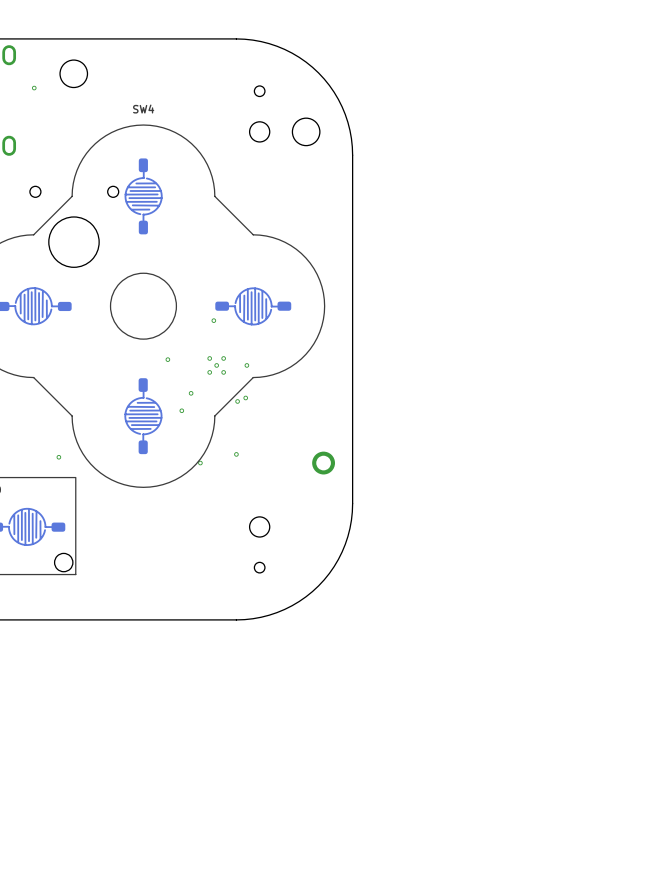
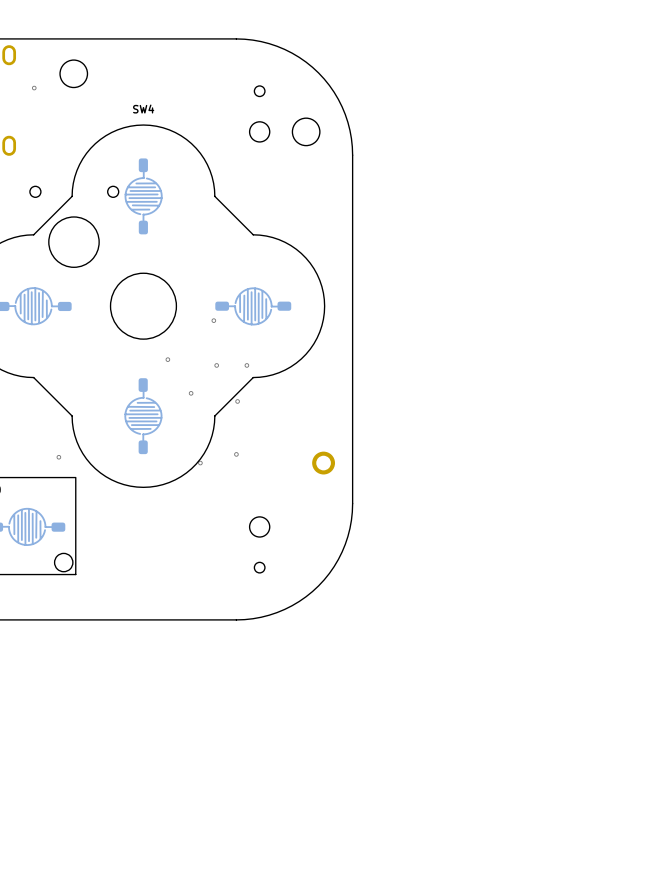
via: (209, 358) -> none
via: (223, 358) -> none
via: (209, 372) -> none
via: (223, 372) -> none
via: (245, 397) -> none
via: (181, 410) -> none

